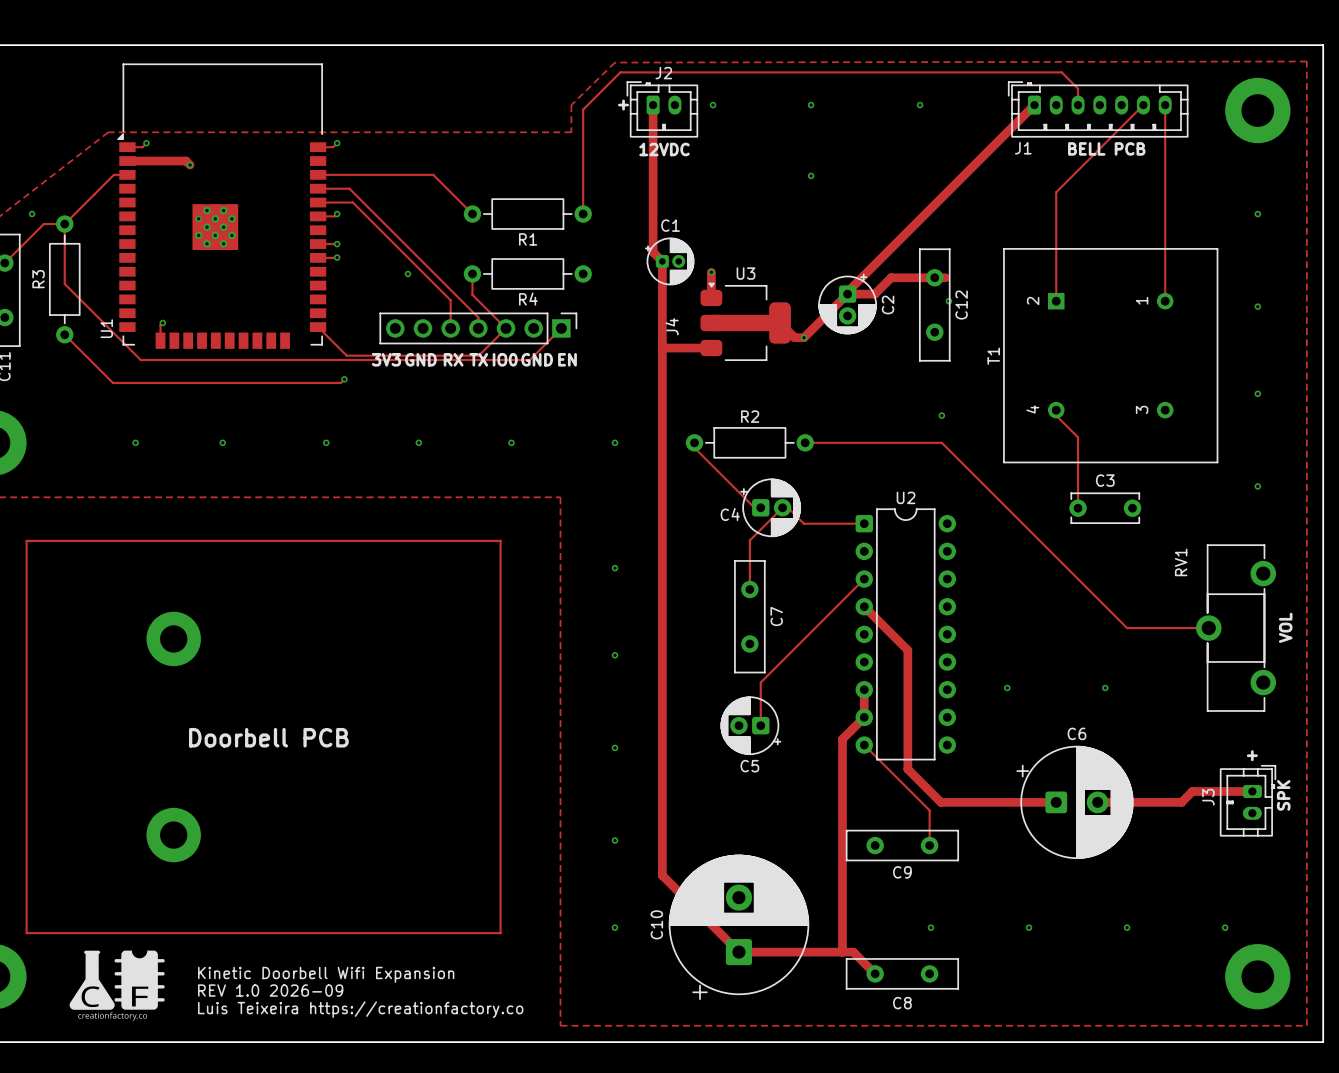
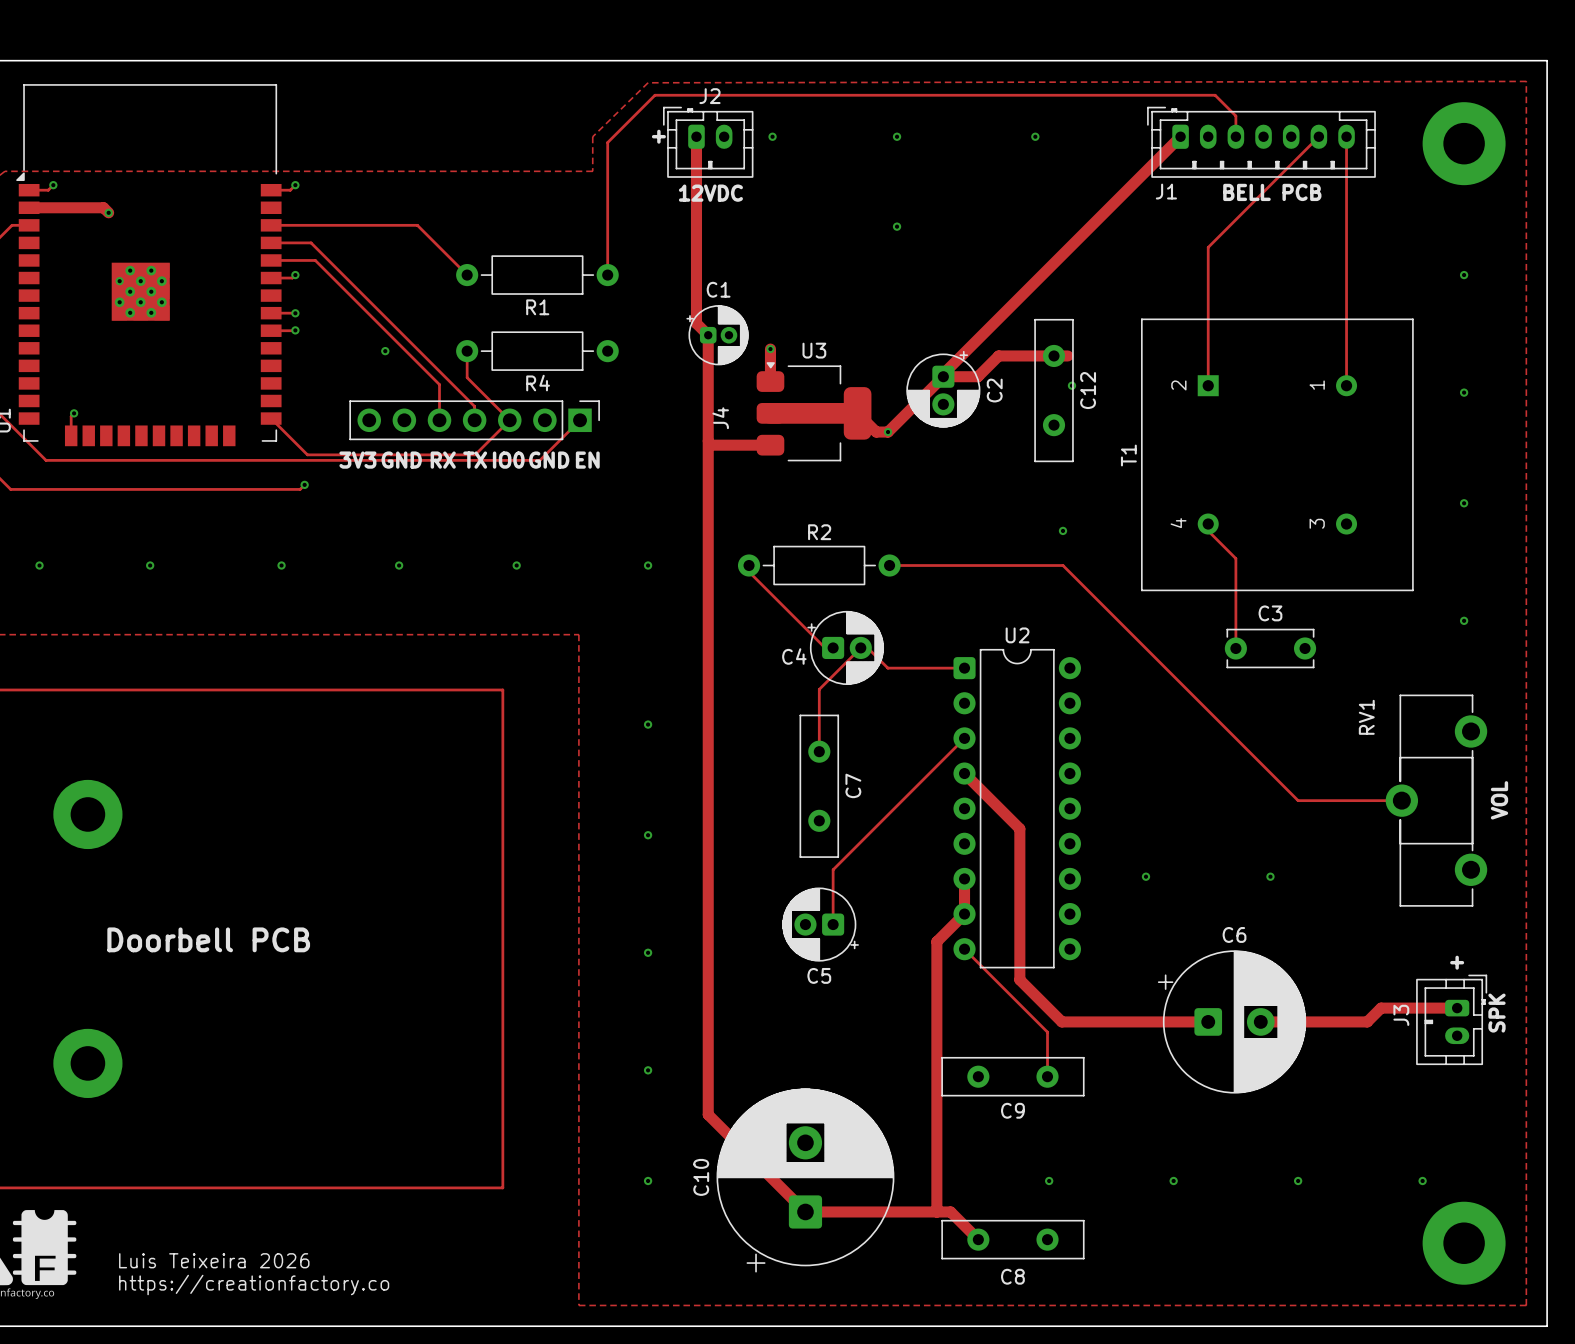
text: Kinetic Doorbell Wifi Expansion (326, 974) -> none
text: REV 1.0 2026-09 (270, 990) -> Luis Teixeira 2026 (214, 1260)
text: Luis Teixeira https://creationfactory.co (360, 1009) -> https://creationfactory.co (254, 1285)

